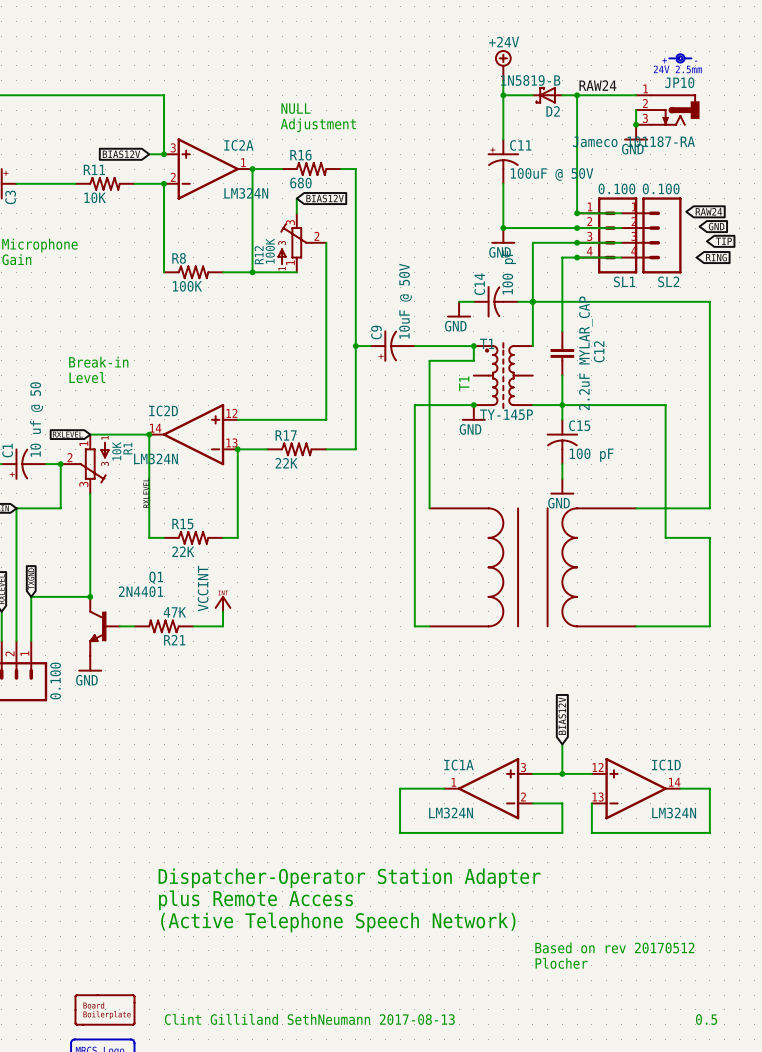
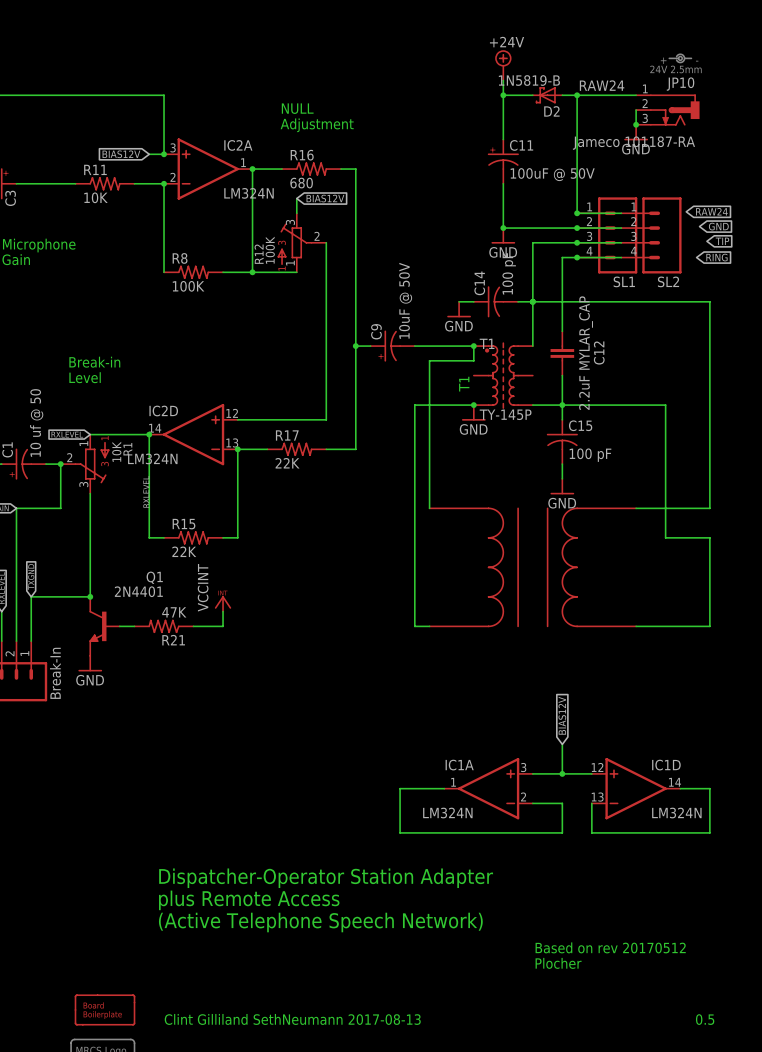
SL1 value: 0.100 (616, 188) -> none
SL2 value: 0.100 (661, 188) -> none
part value: 0.100 (55, 680) -> Break-In (55, 673)

